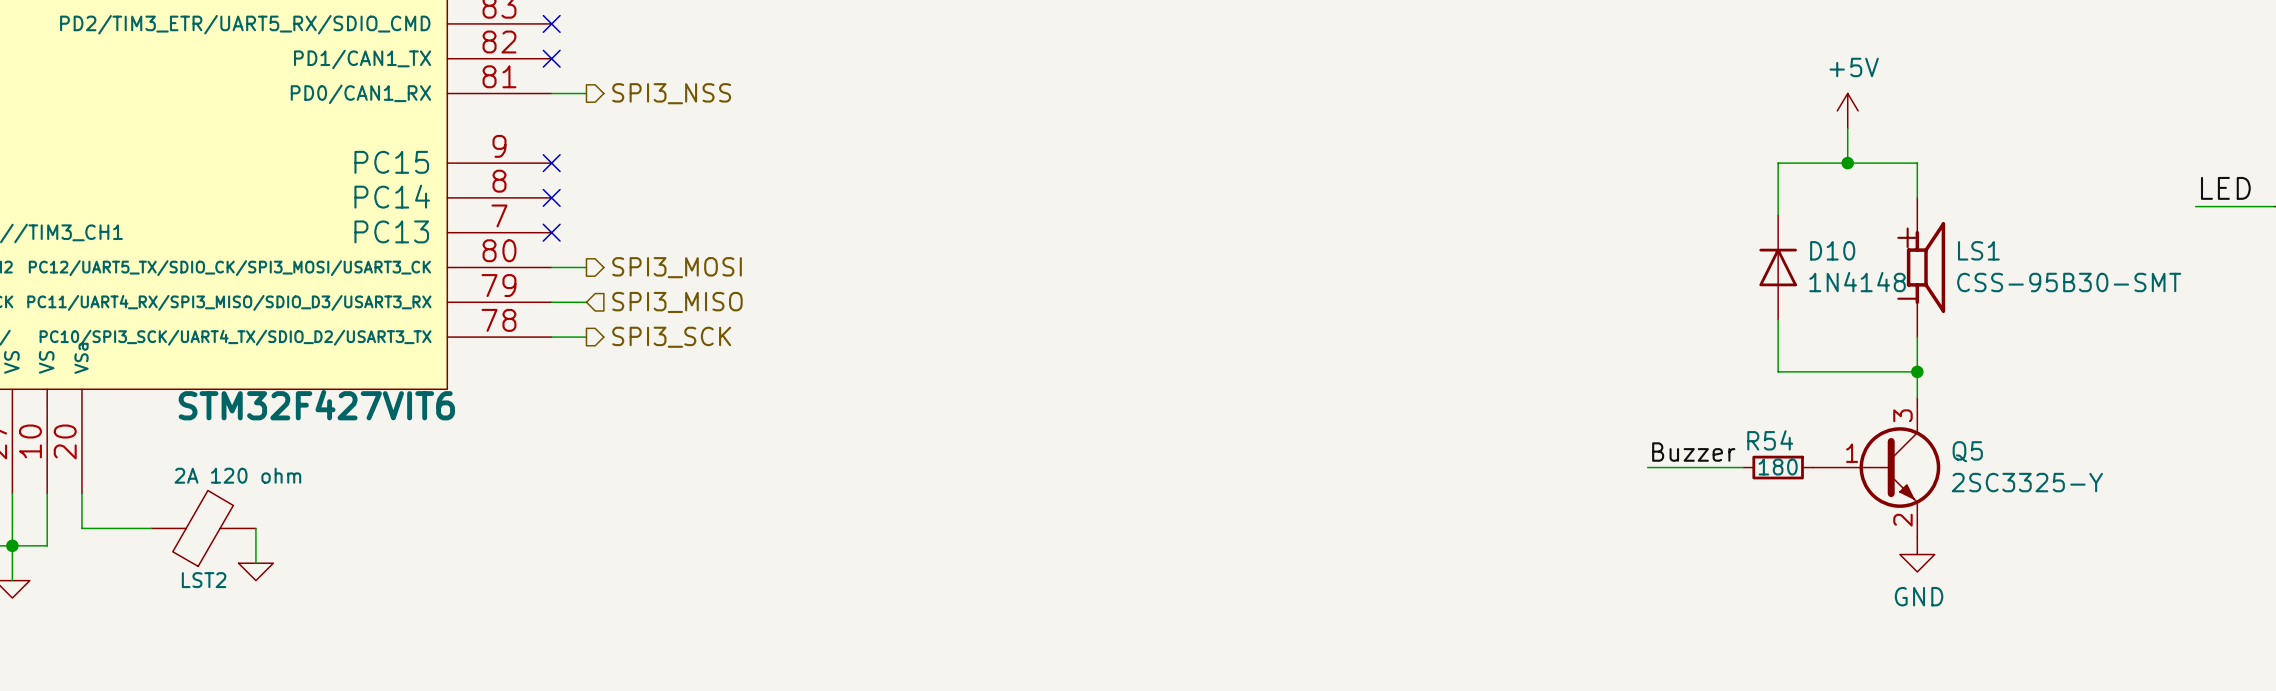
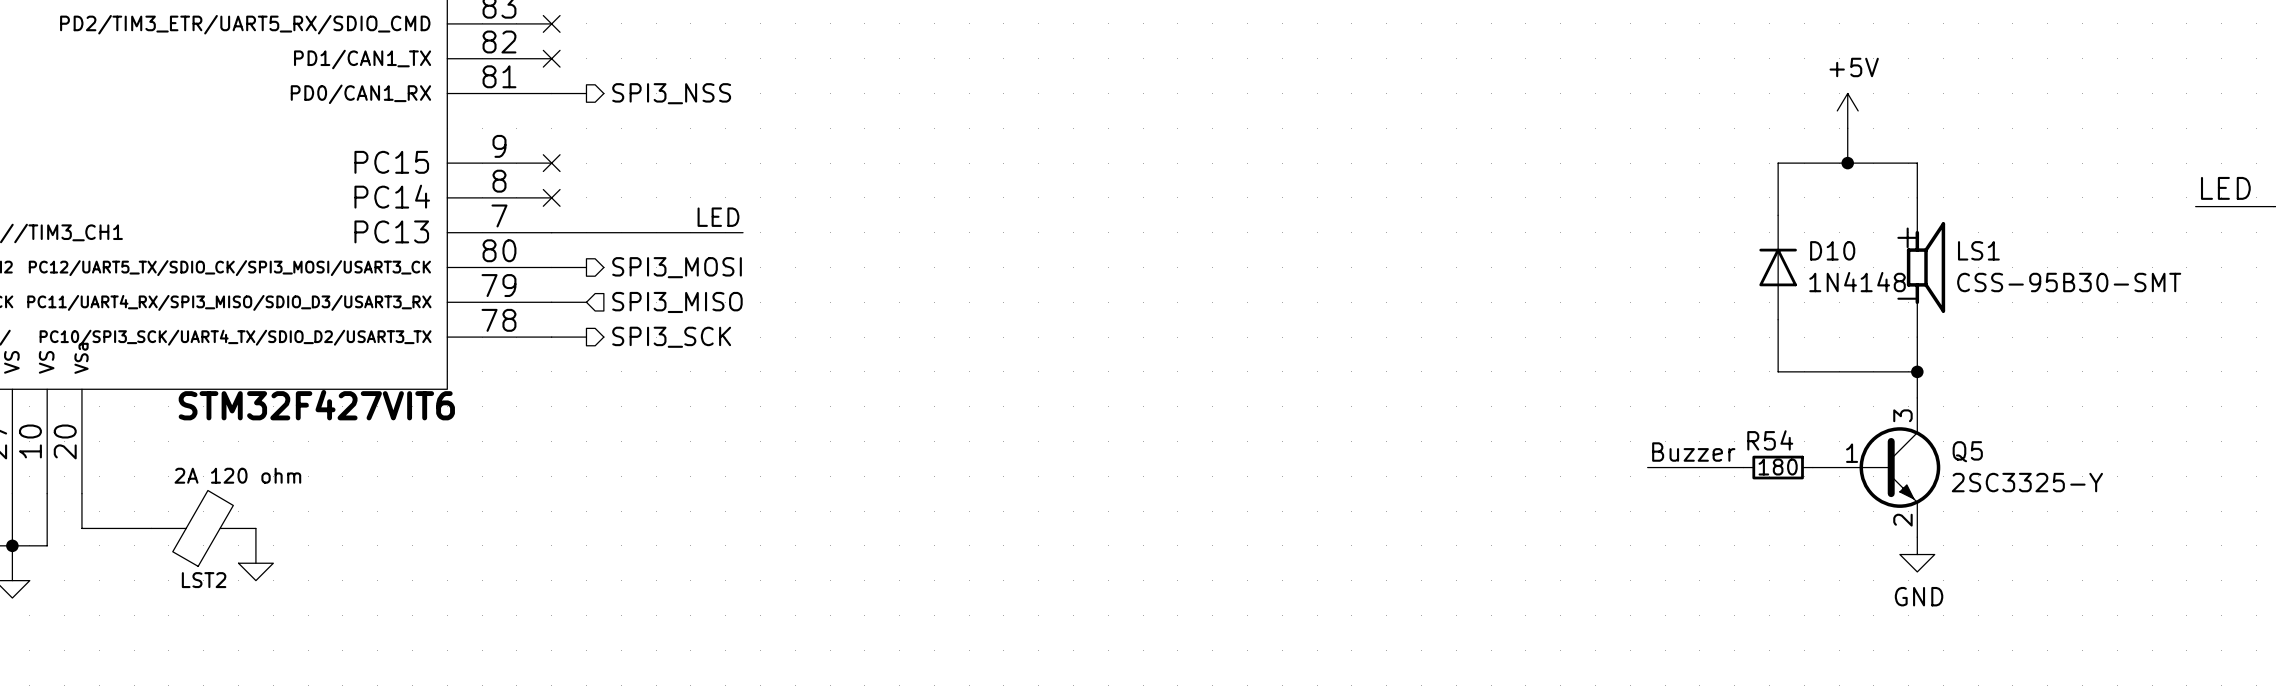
label: none -> LED (718, 217)
wire: none -> (551, 232) (743, 232)
no-connect mark: (551, 232) -> none

